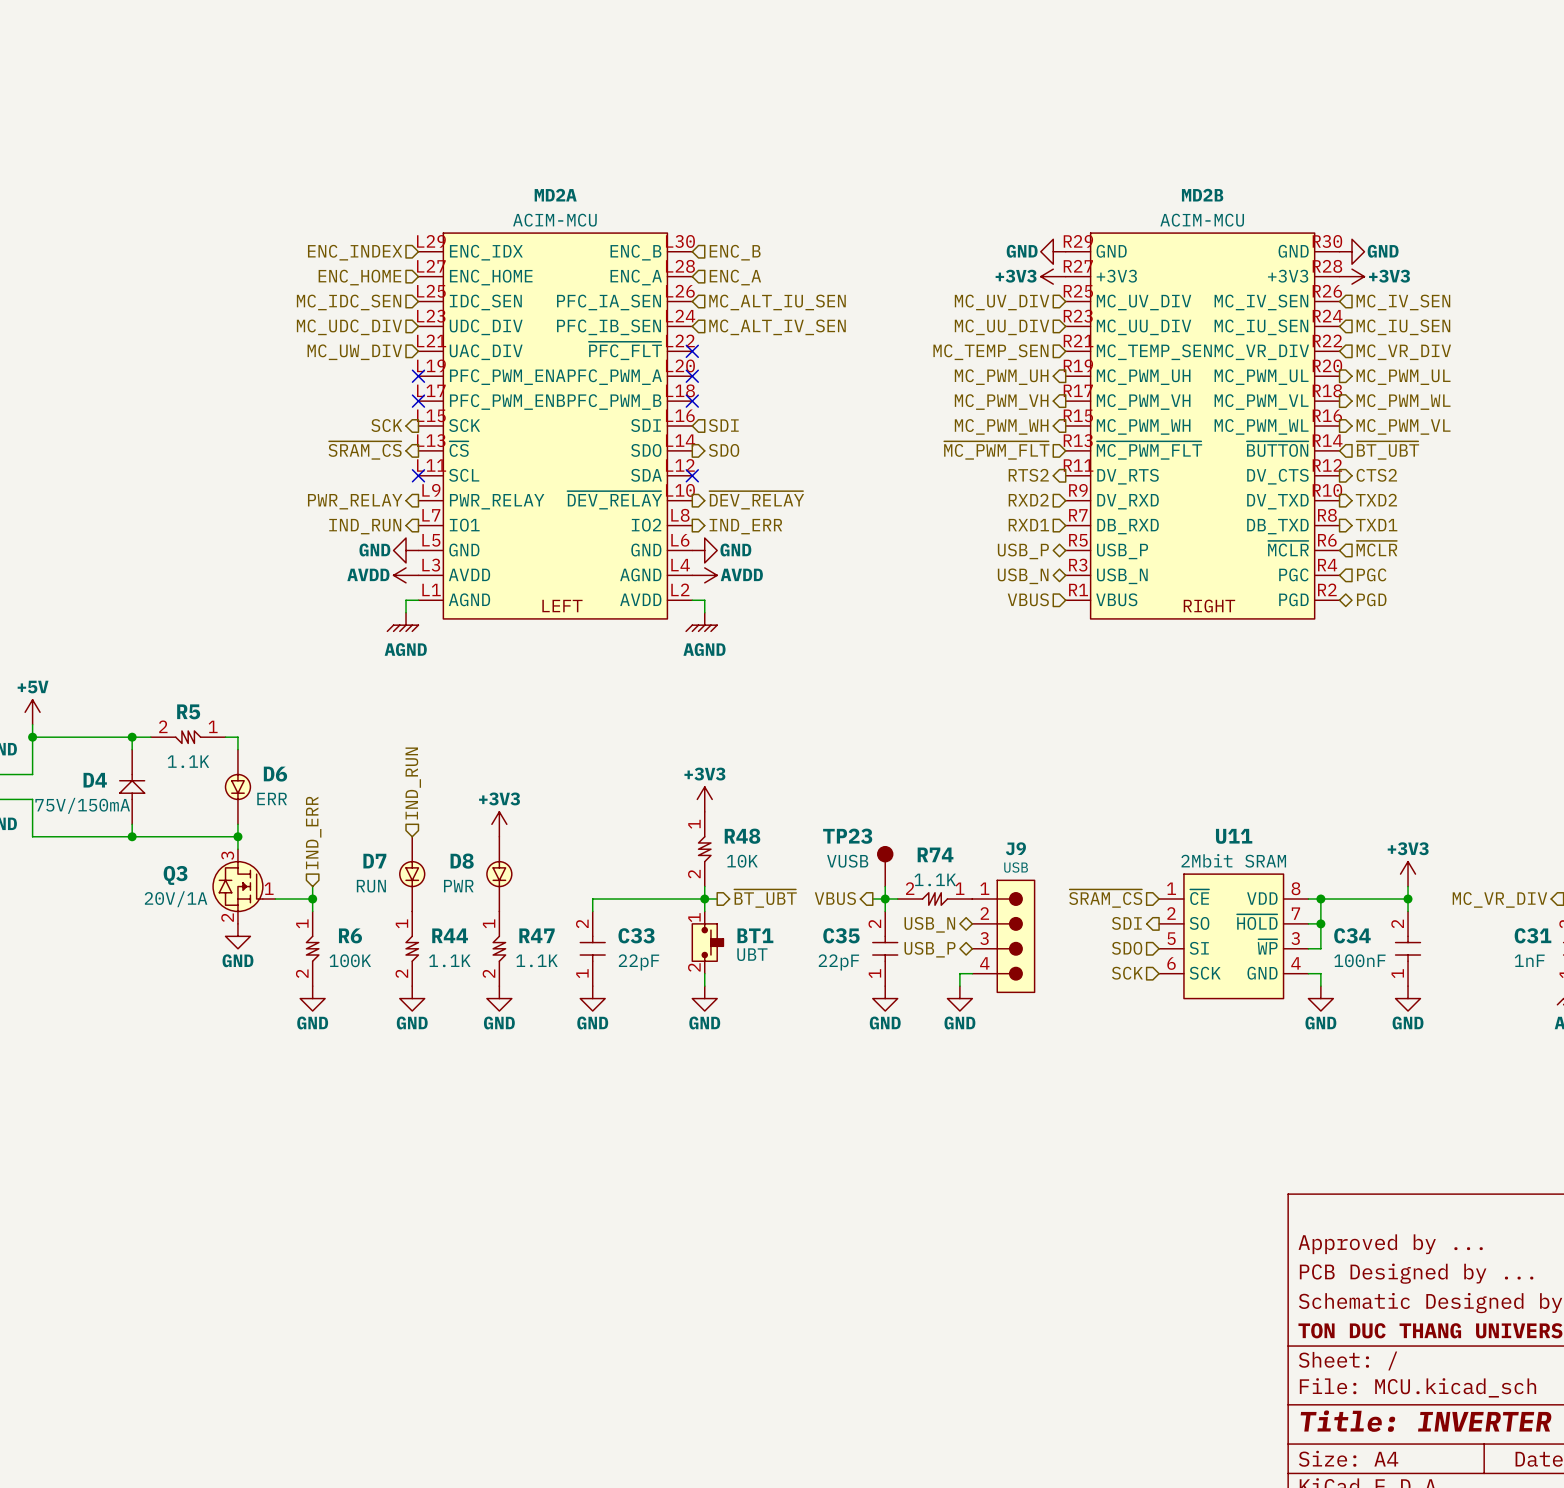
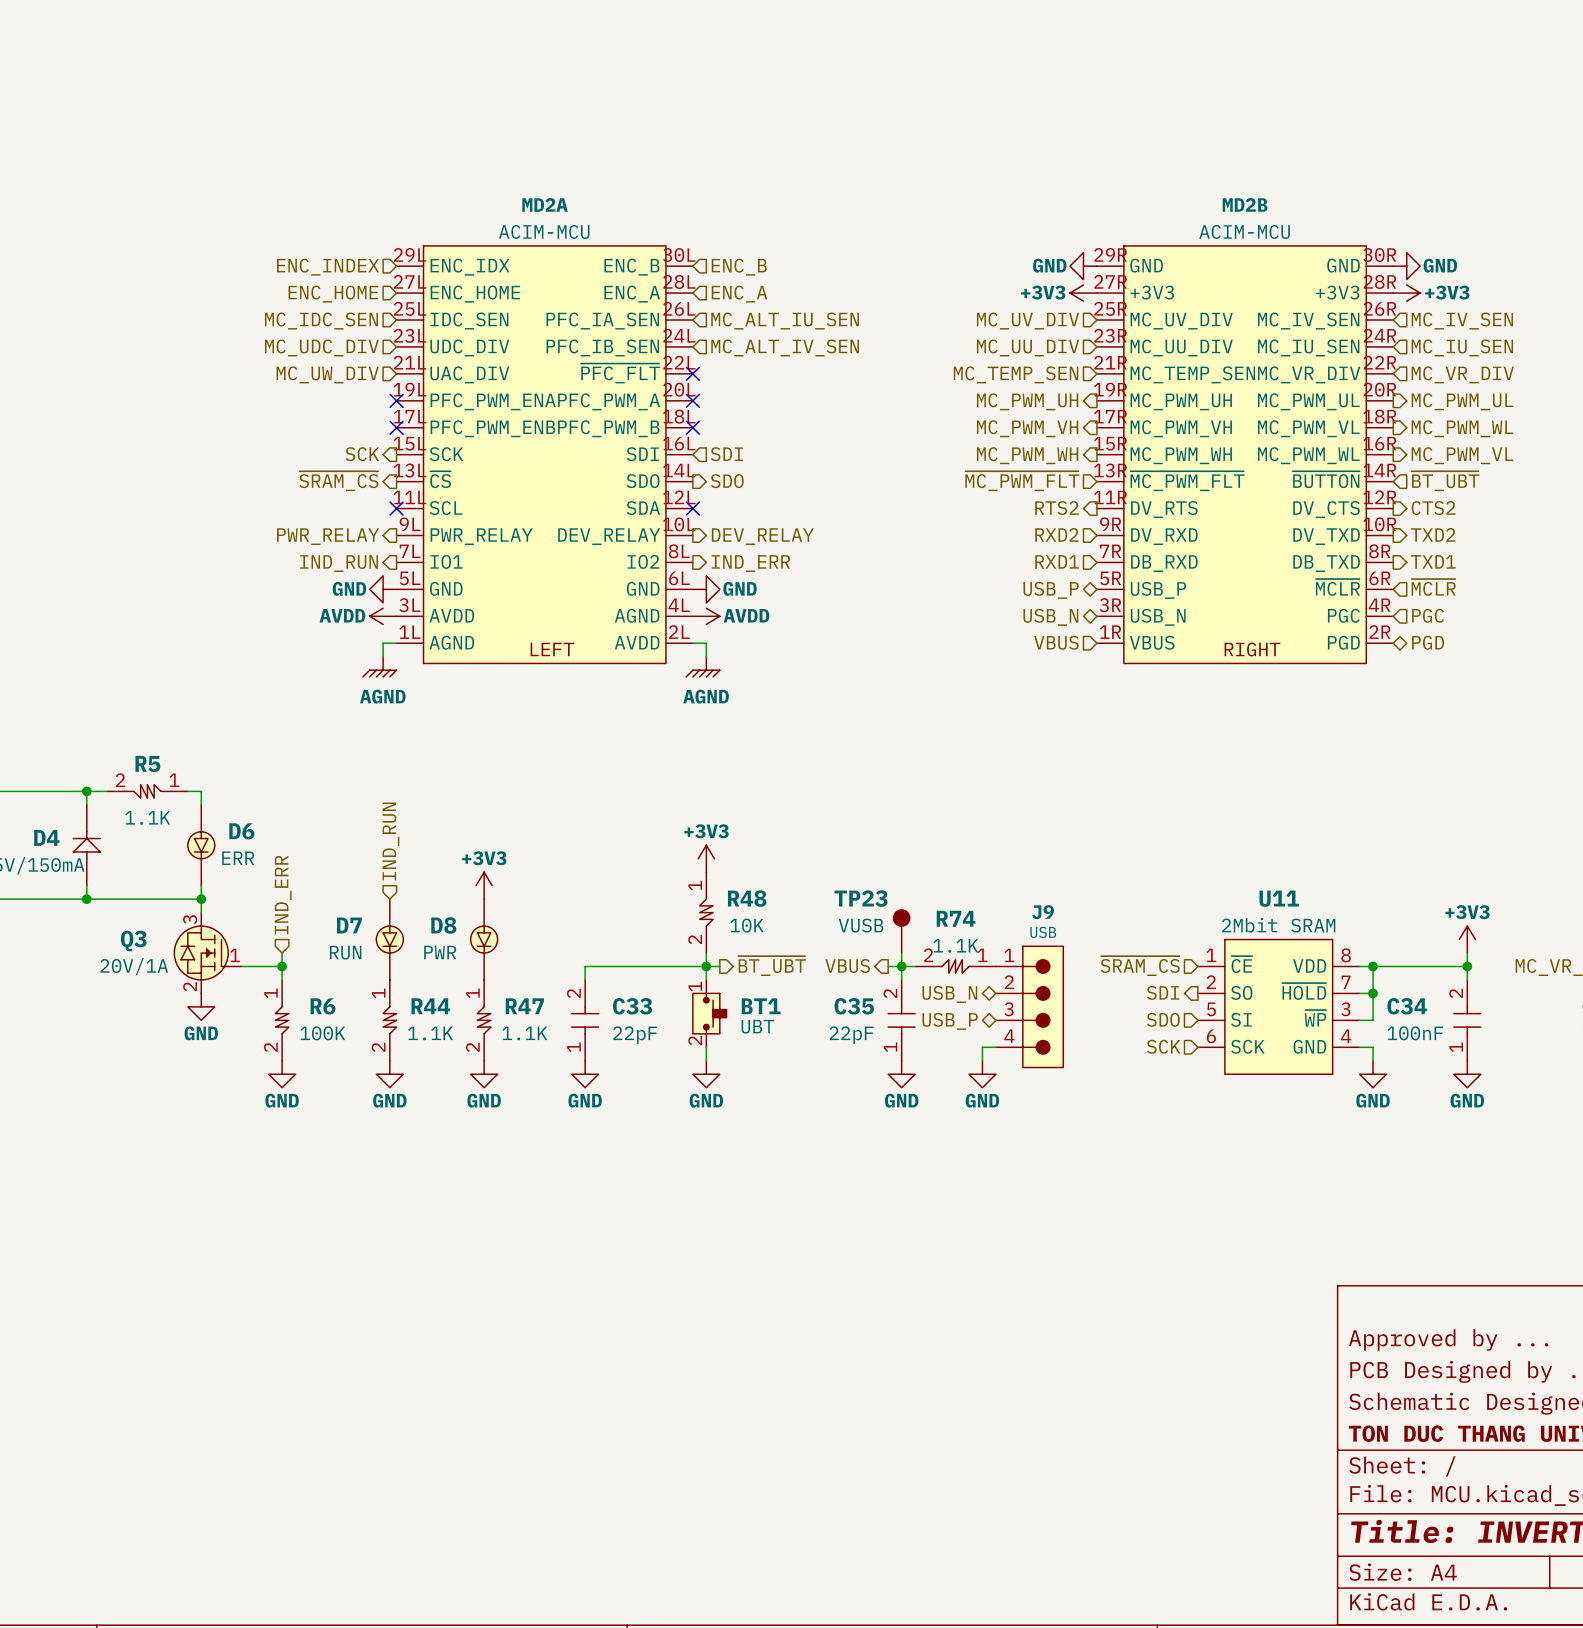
MD2A symbol: [418, 233, 693, 619] -> [396, 245, 693, 664]
MD2B symbol: [1065, 233, 1340, 619] -> [1096, 245, 1394, 664]
hierarchical label: ~{DEV_RELAY} (756, 500) -> DEV_RELAY (762, 536)

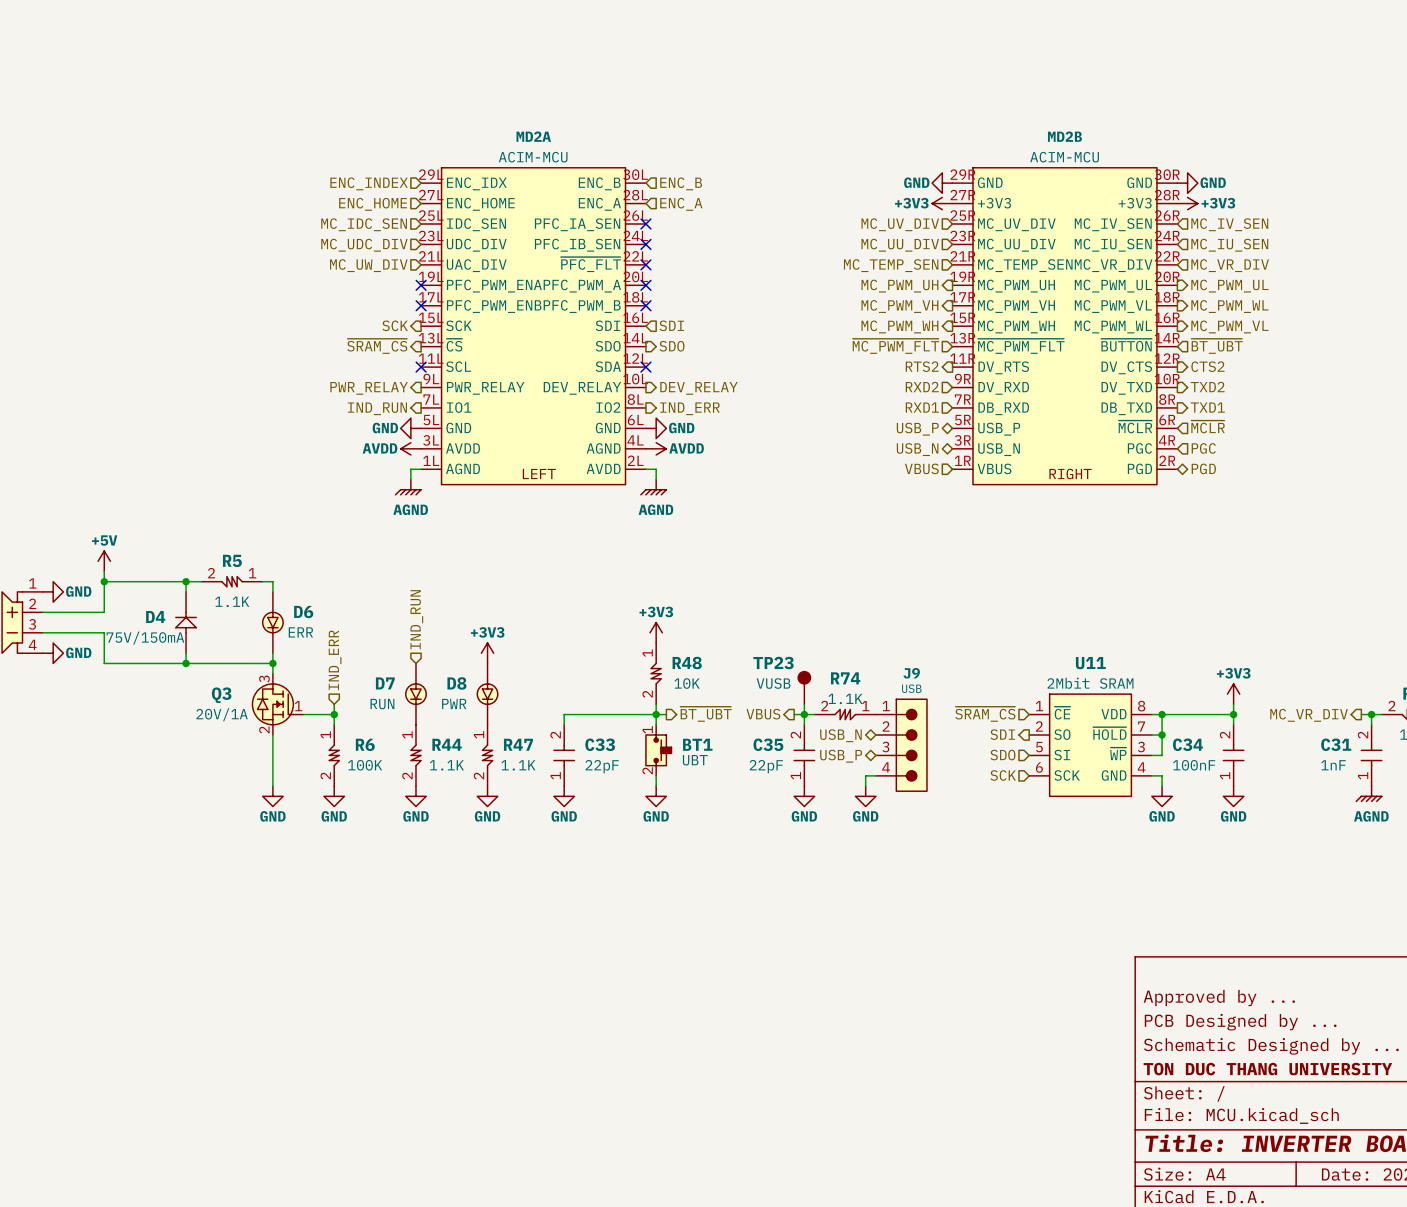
no-connect mark: none -> (645, 223)
hierarchical label: MC_ALT_IU_SEN (785, 321) -> none
no-connect mark: none -> (645, 244)
hierarchical label: MC_ALT_IV_SEN (785, 347) -> none
wire: none -> (272, 735) (272, 786)
power symbol position: GND (201, 1006) -> GND (272, 796)

